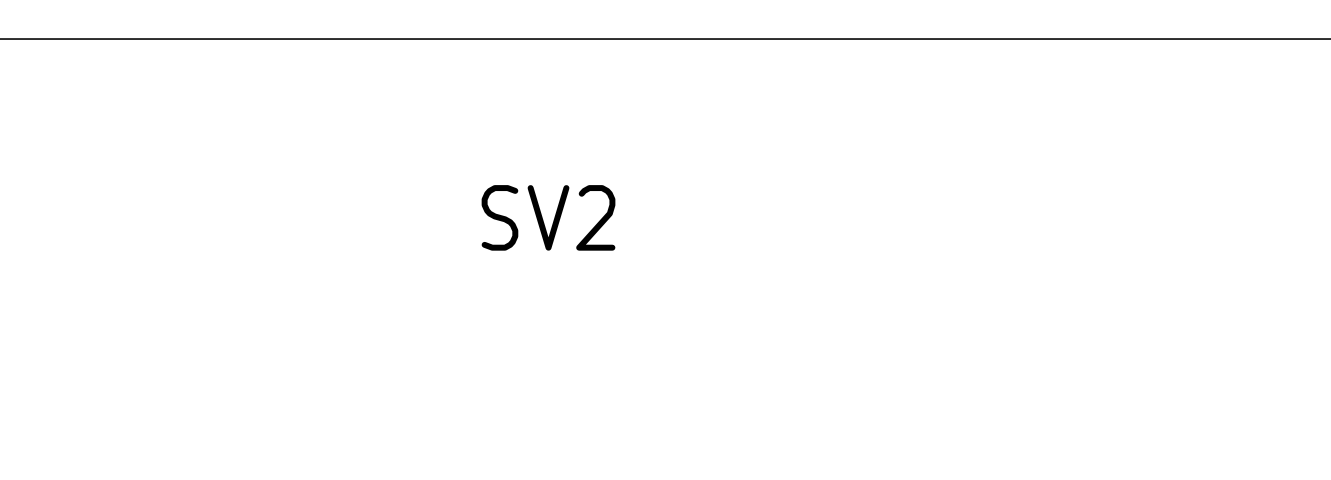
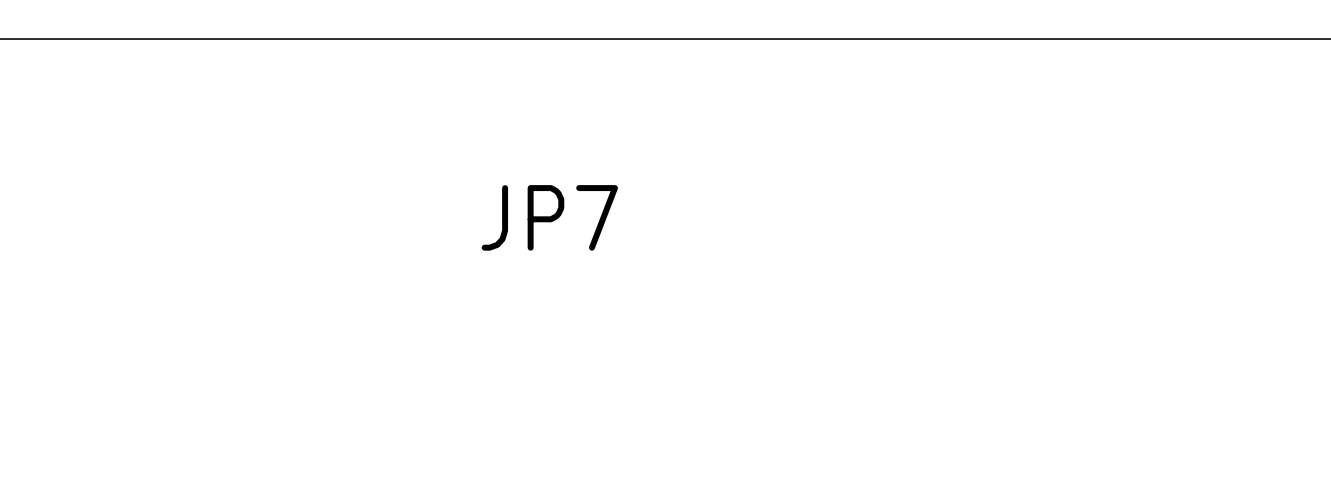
SV2 name: SV2 (548, 217) -> JP7 (549, 217)

